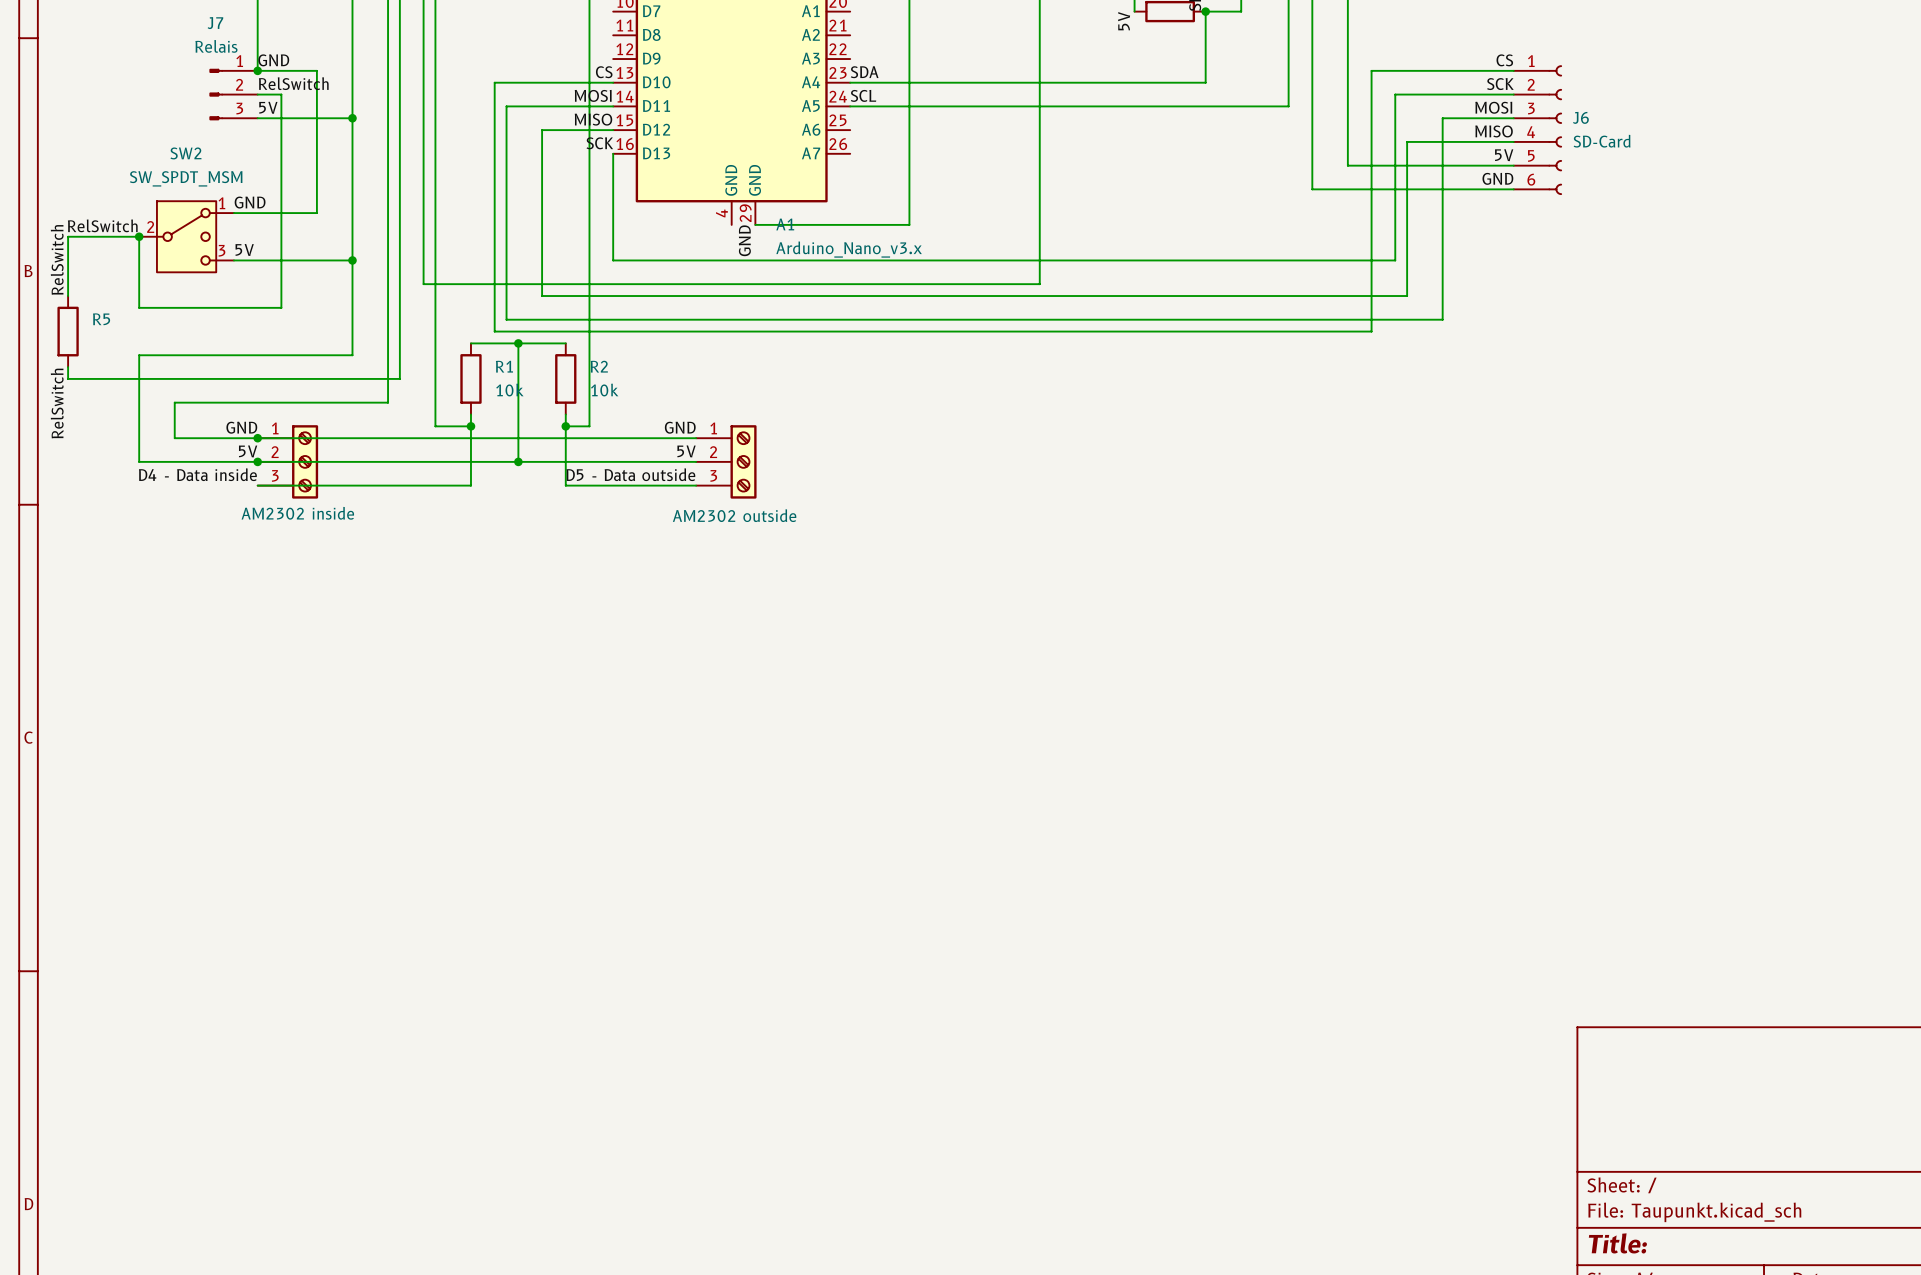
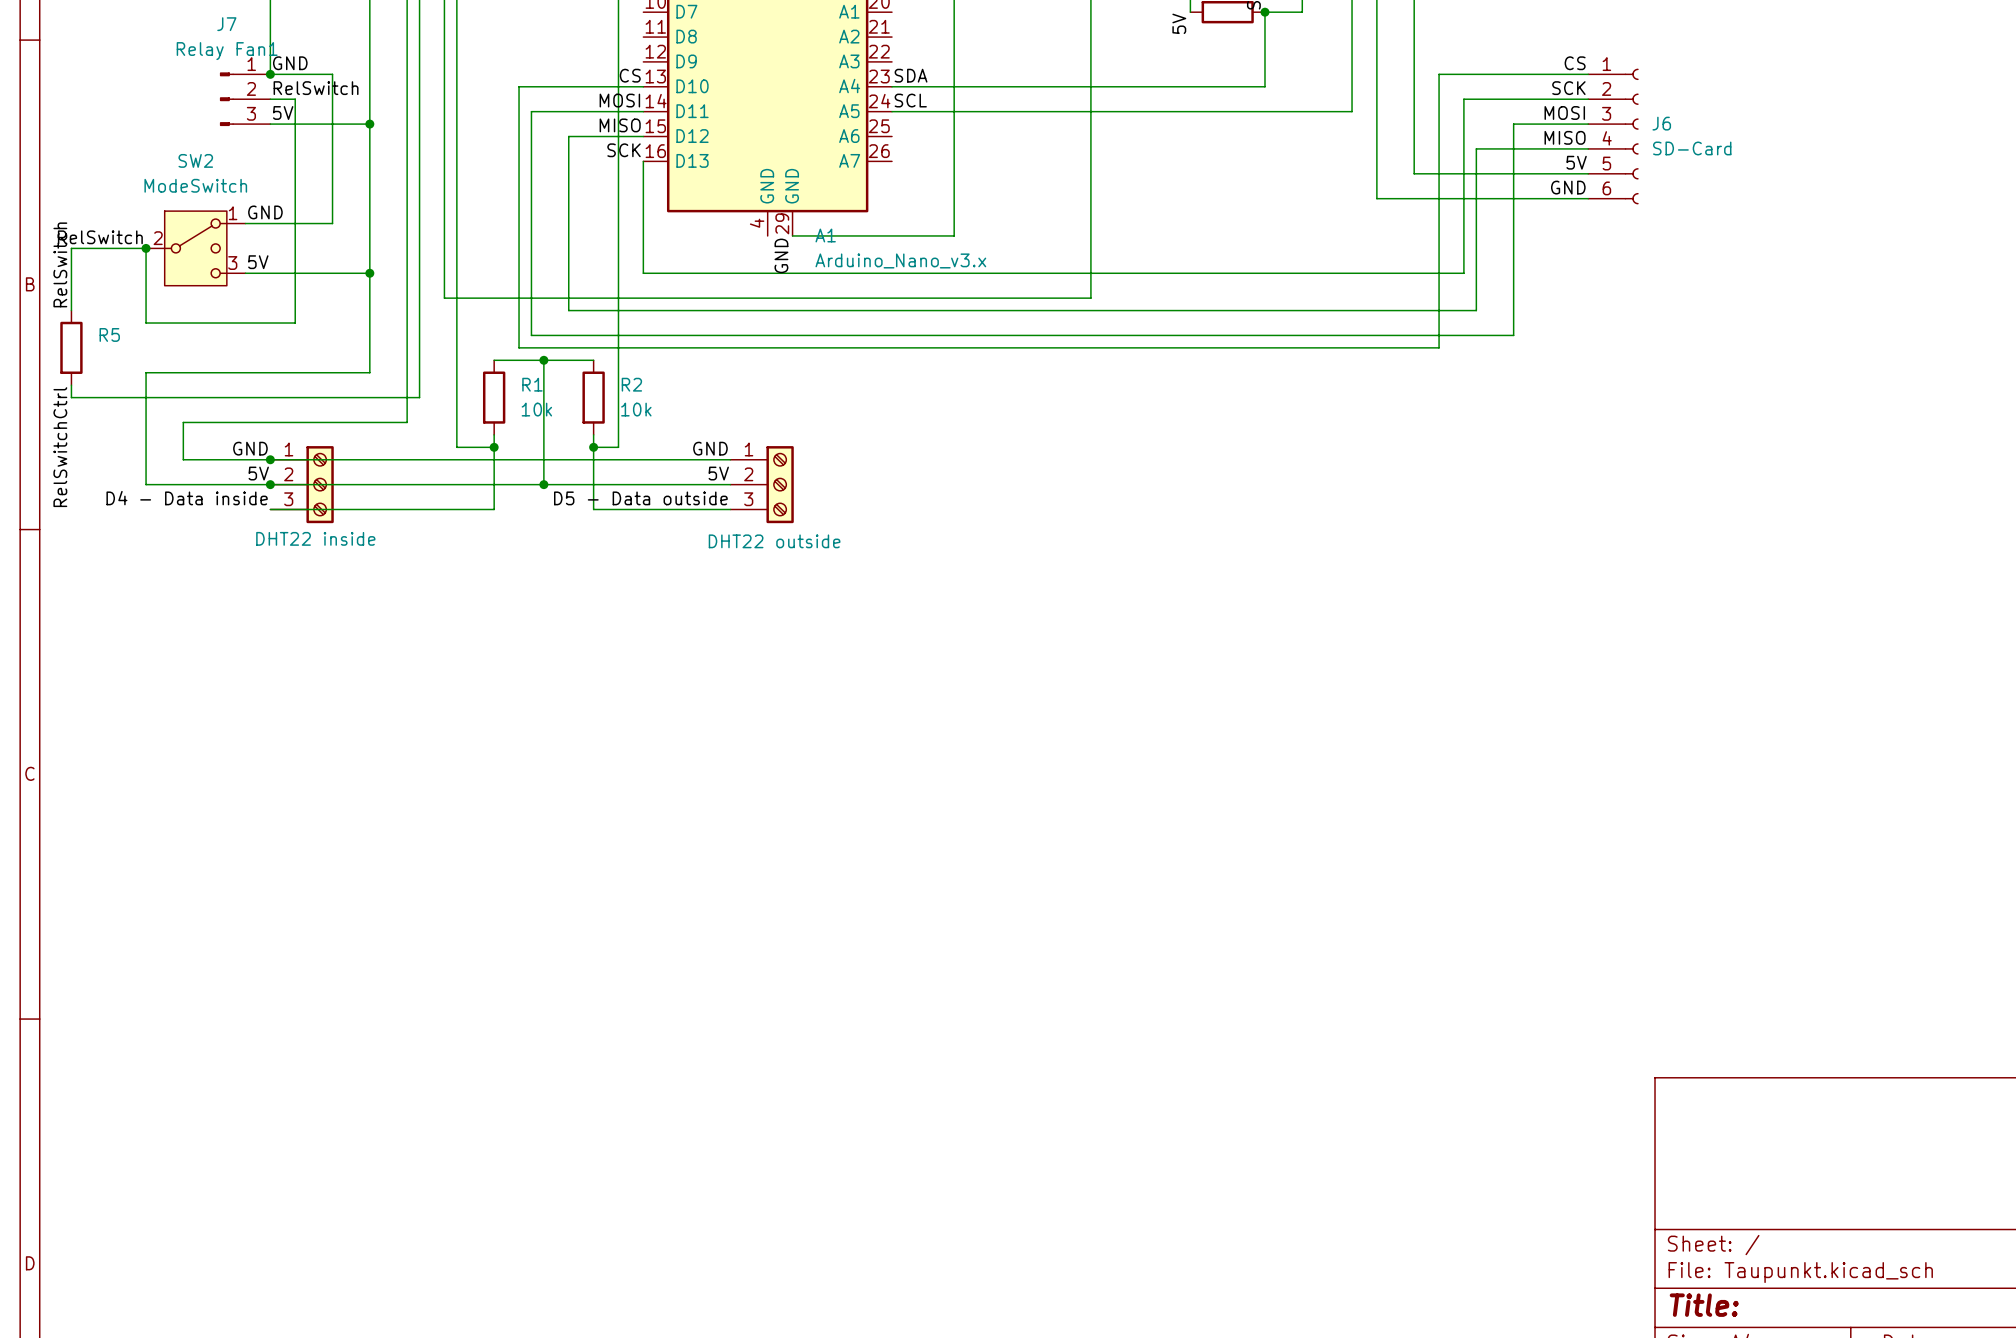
J7 value: Relais (216, 46) -> Relay Fan1 (227, 51)
SW2 value: SW_SPDT_MSM (186, 178) -> ModeSwitch (195, 185)
label: RelSwitch (57, 403) -> RelSwitchCtrl (60, 447)
part value: AM2302 inside (297, 513) -> DHT22 inside (315, 538)
part value: AM2302 outside (734, 515) -> DHT22 outside (774, 541)

